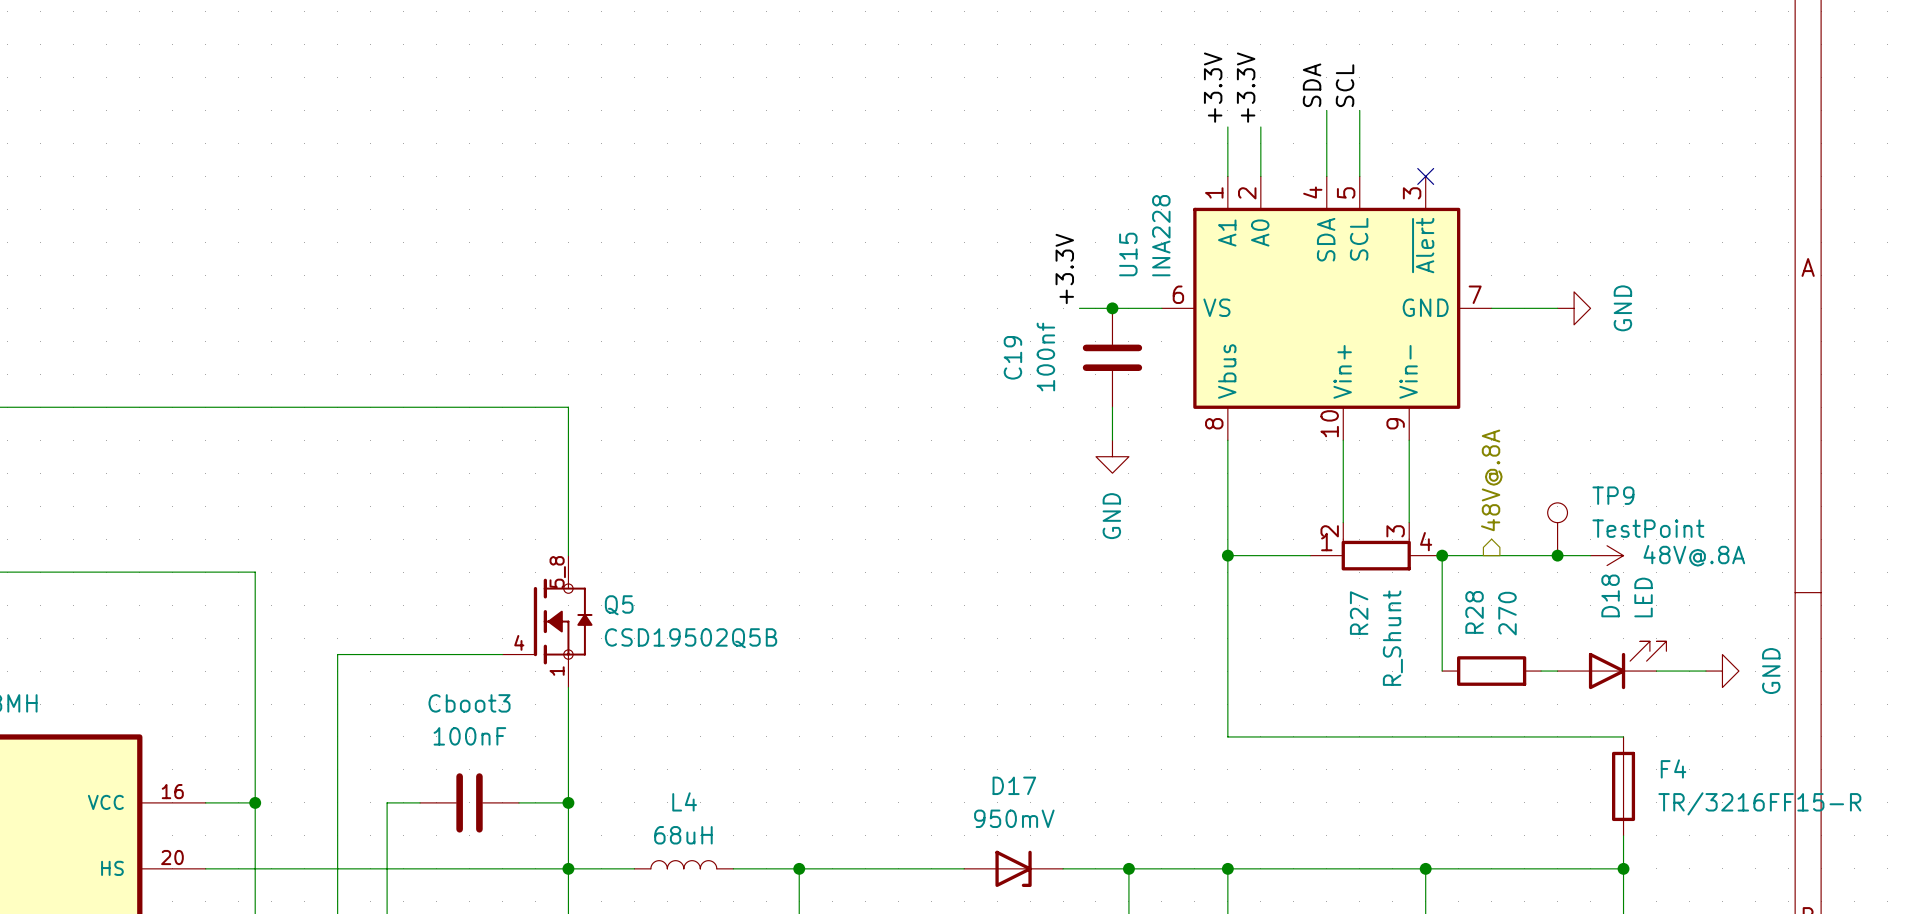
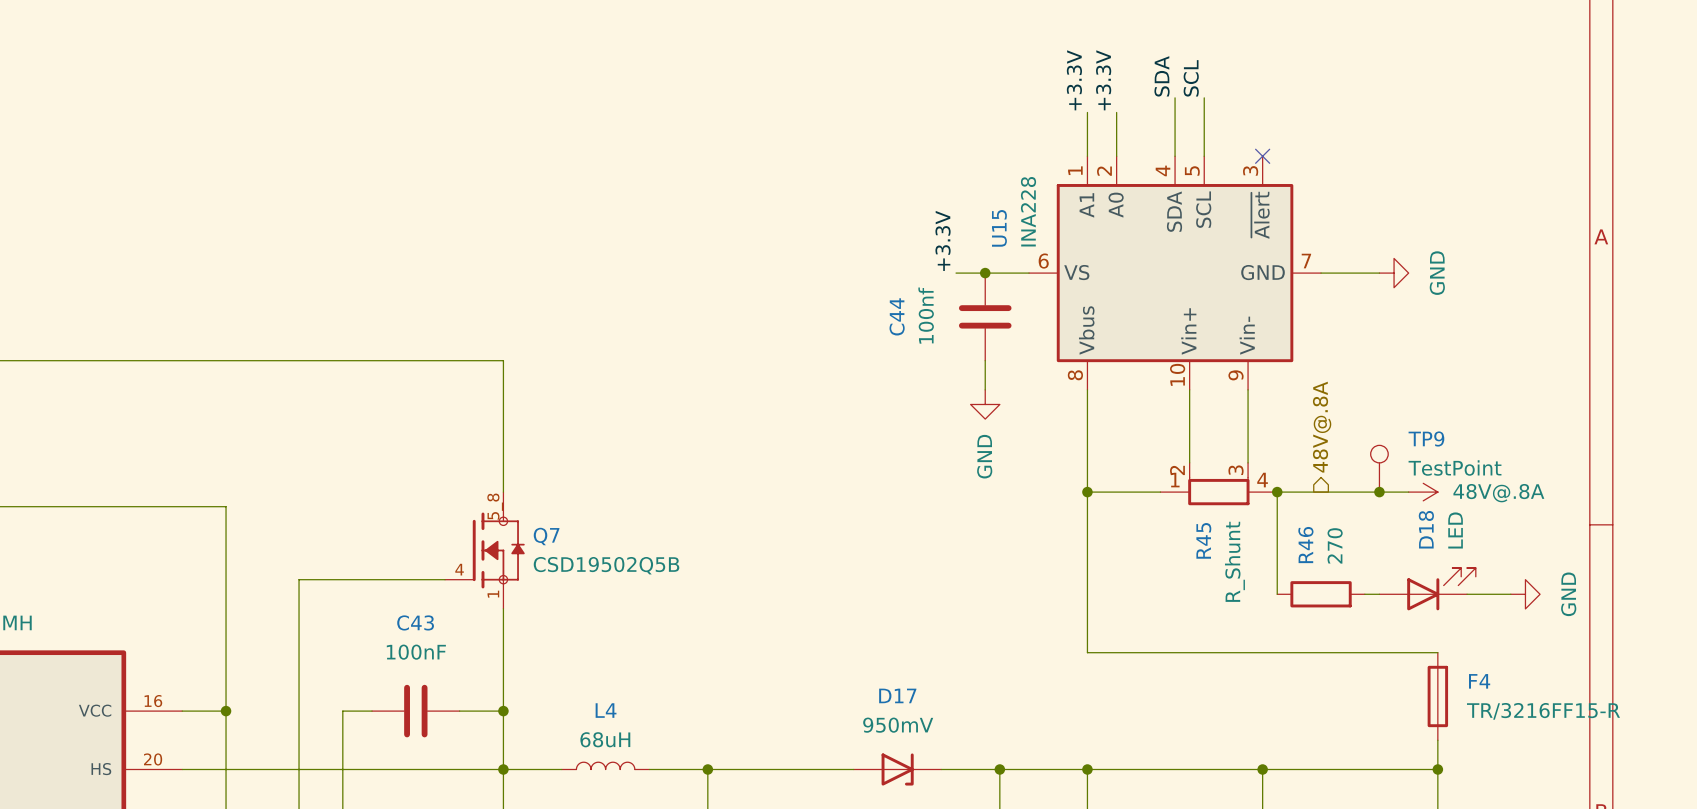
C19 name: C19 (1012, 357) -> C44 (897, 316)
Q5 name: Q5 (619, 605) -> Q7 (546, 536)
R28 name: R28 (1474, 612) -> R46 (1305, 545)
R27 name: R27 (1359, 613) -> R45 (1203, 540)
Cboot3 name: Cboot3 (469, 703) -> C43 (415, 622)

